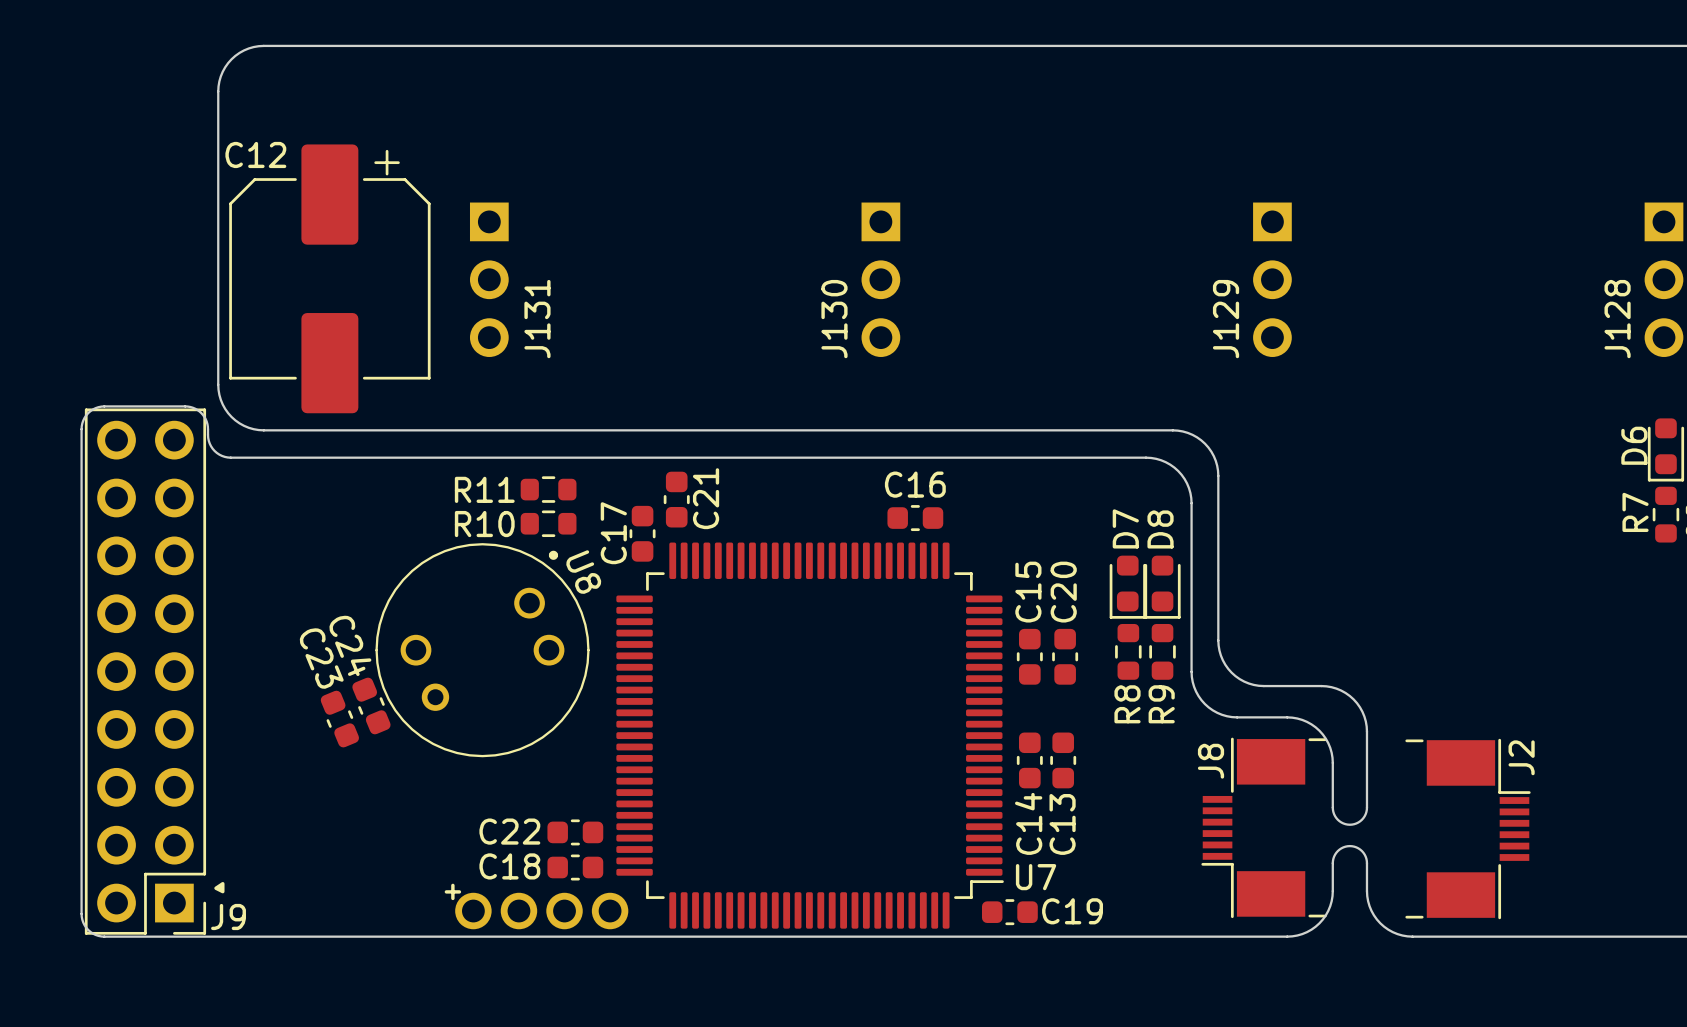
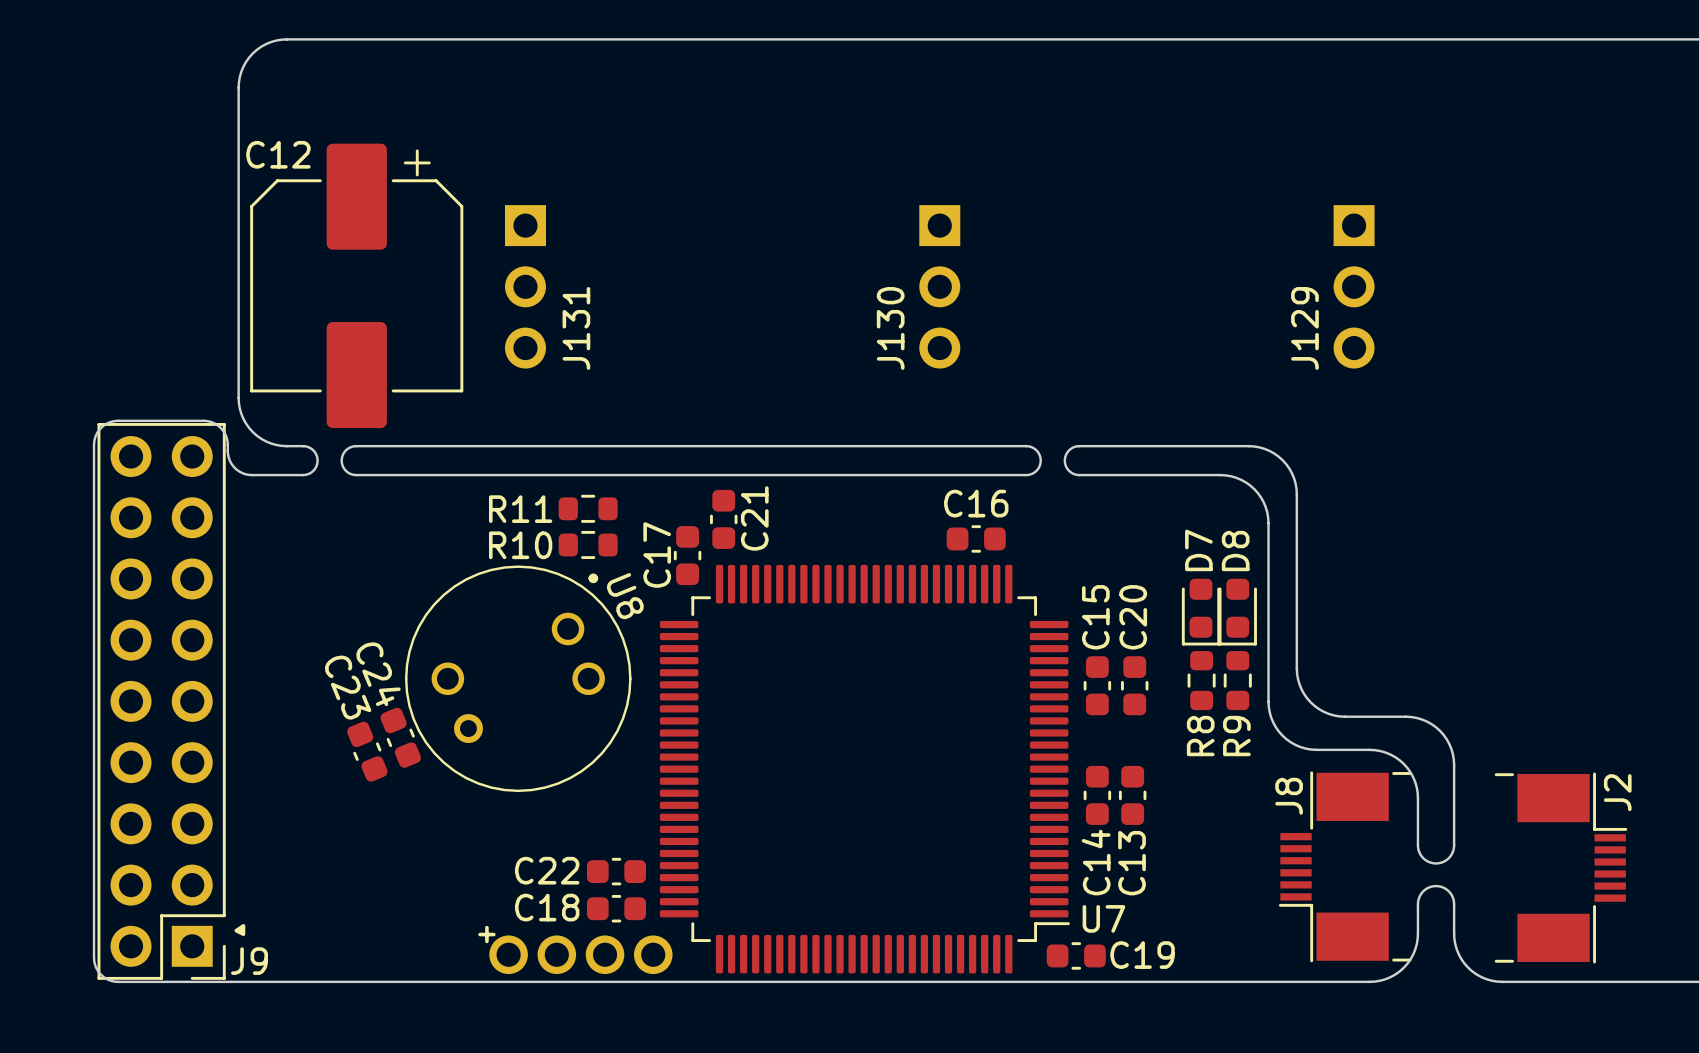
board edge: (279, 430) (329, 430) -> (303, 446) (313, 450) (317, 460) (313, 470) (303, 475)
board edge: (962, 430) (1012, 430) -> (1026, 446) (1036, 450) (1040, 460) (1036, 470) (1026, 475)
board edge: (279, 457) (329, 457) -> (356, 446) (345, 450) (341, 460) (345, 470) (356, 475)
board edge: (962, 457) (1012, 457) -> (1079, 446) (1069, 450) (1064, 460) (1069, 470) (1079, 475)

